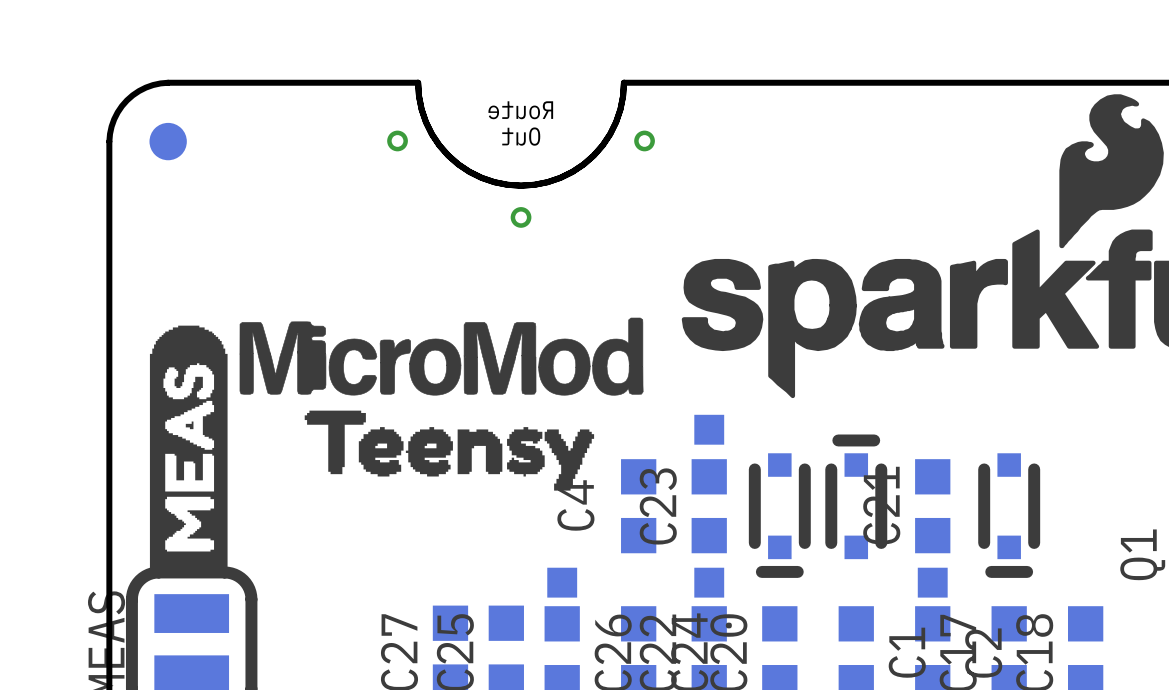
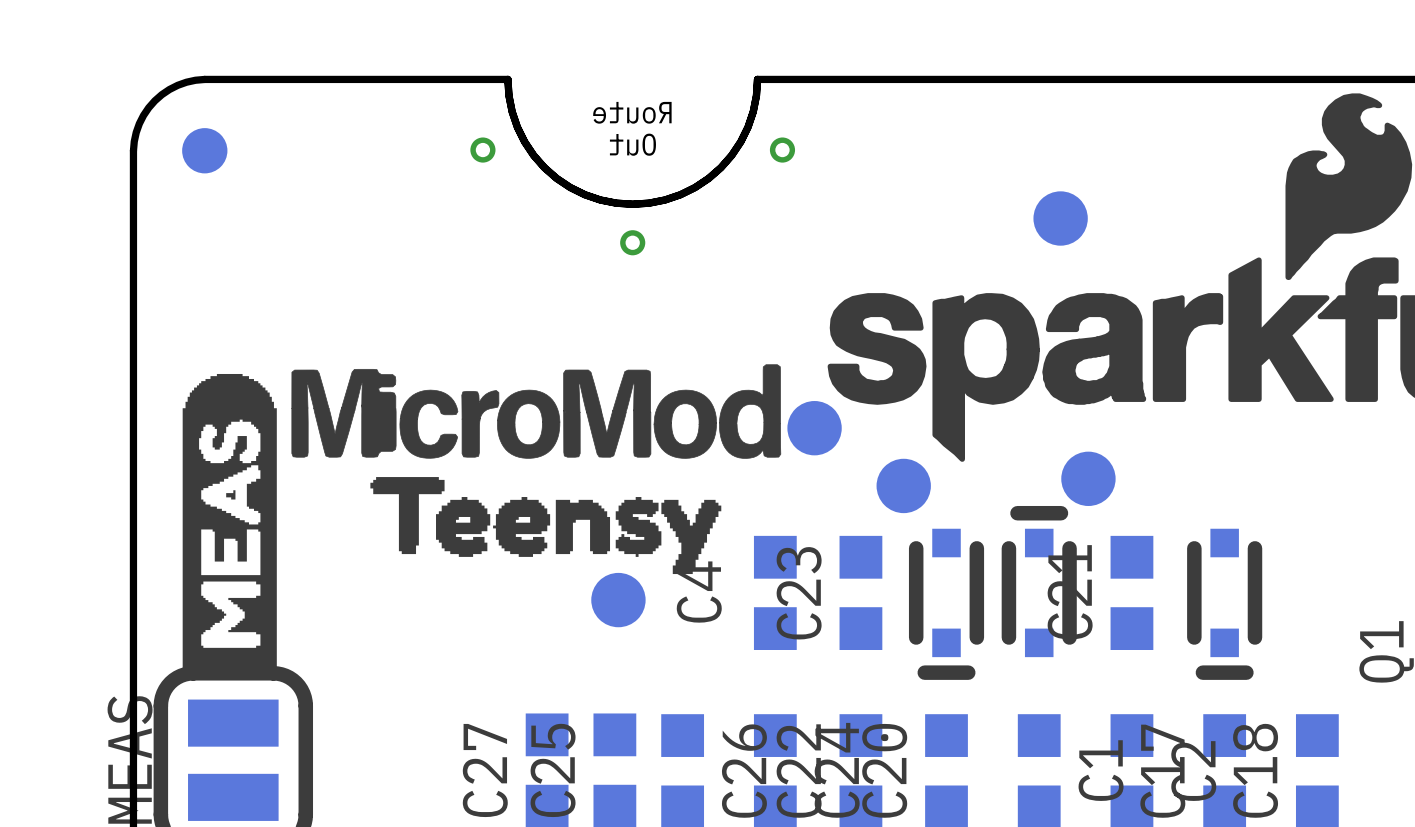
part: none -> (1060, 218)
part: none -> (814, 428)
part: none -> (1088, 478)
part: none -> (903, 485)
part: (709, 429) -> none
part: none -> (618, 600)
part: (562, 582) -> none
part: (709, 582) -> none
part: (932, 582) -> none

